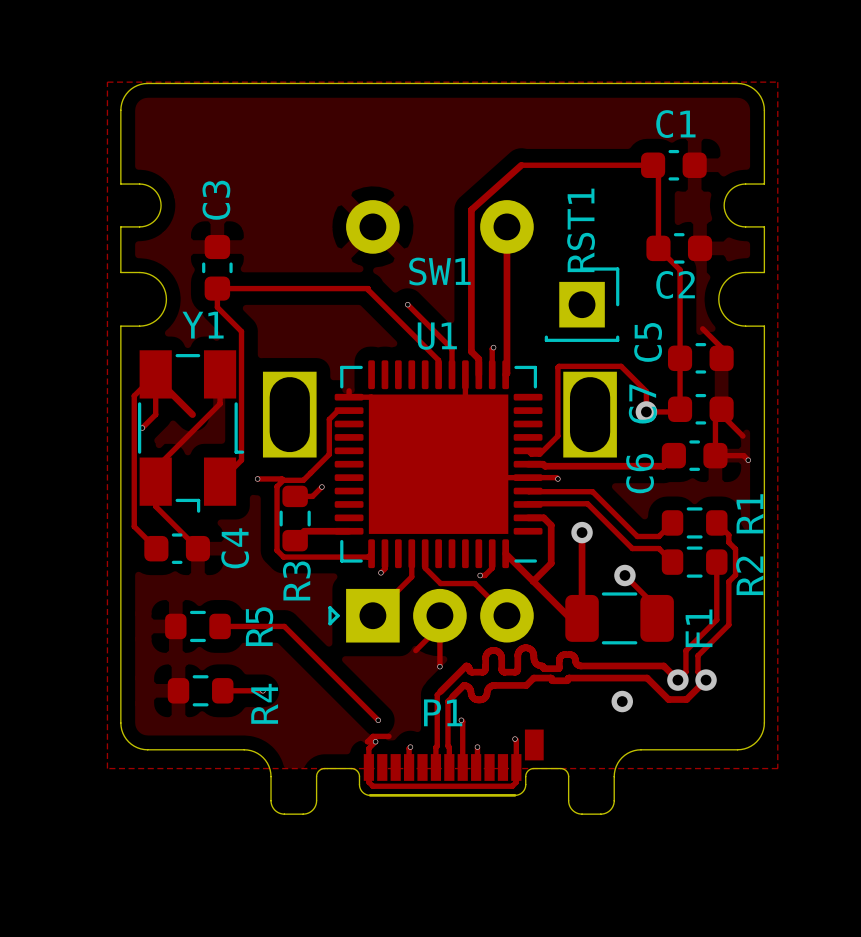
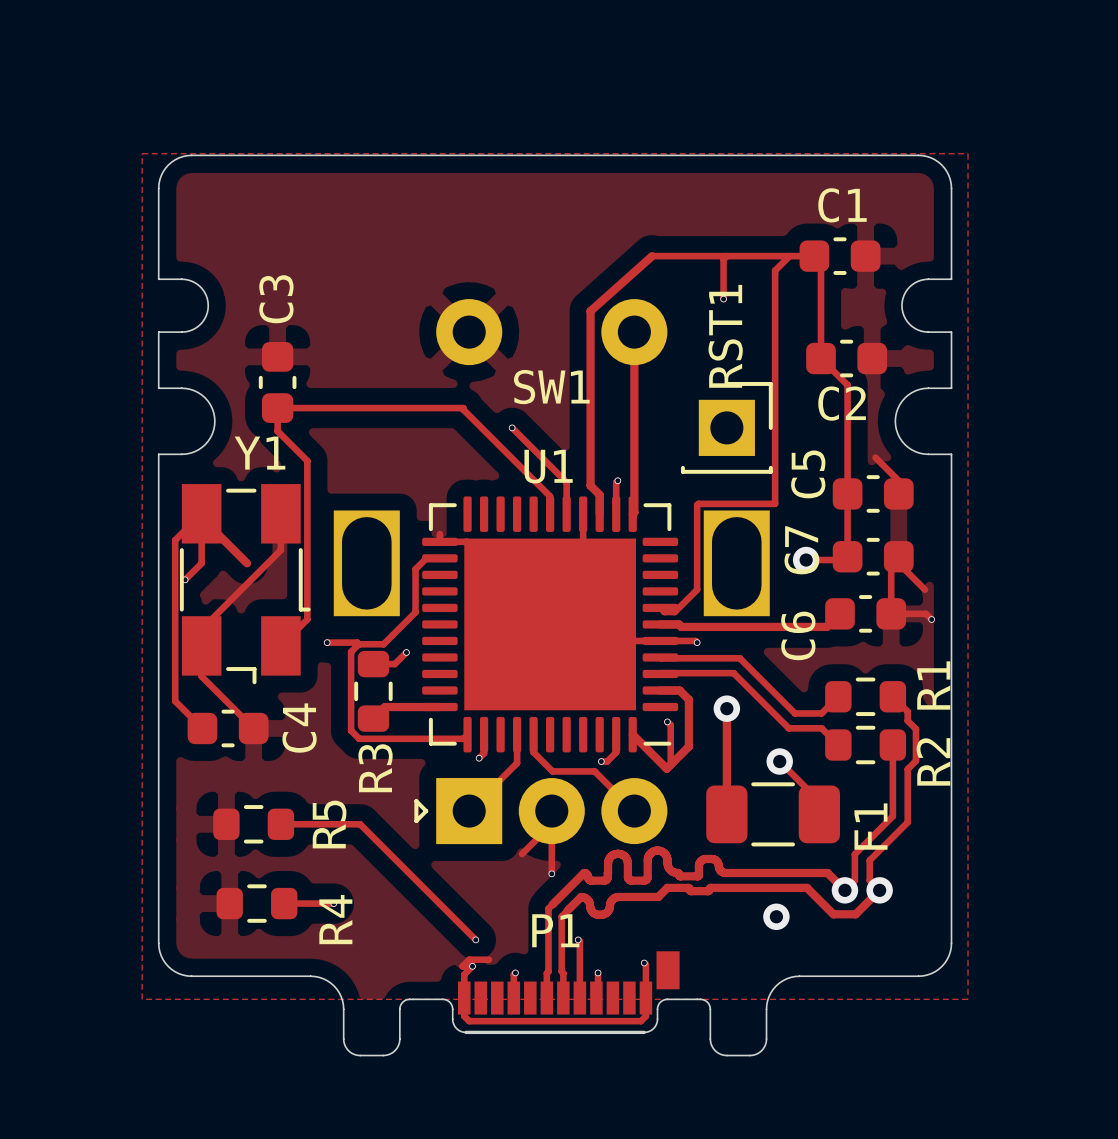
track: none -> (726, 256) (723, 259) (723, 299)
via: none -> (723, 299)
track: (621, 366) (646, 391) (646, 411) -> (775, 503) (775, 270) (789, 256)
track: none -> (667, 721) (670, 725) (670, 764)
via: none -> (667, 721)
track: (533, 581) (570, 618) -> none

